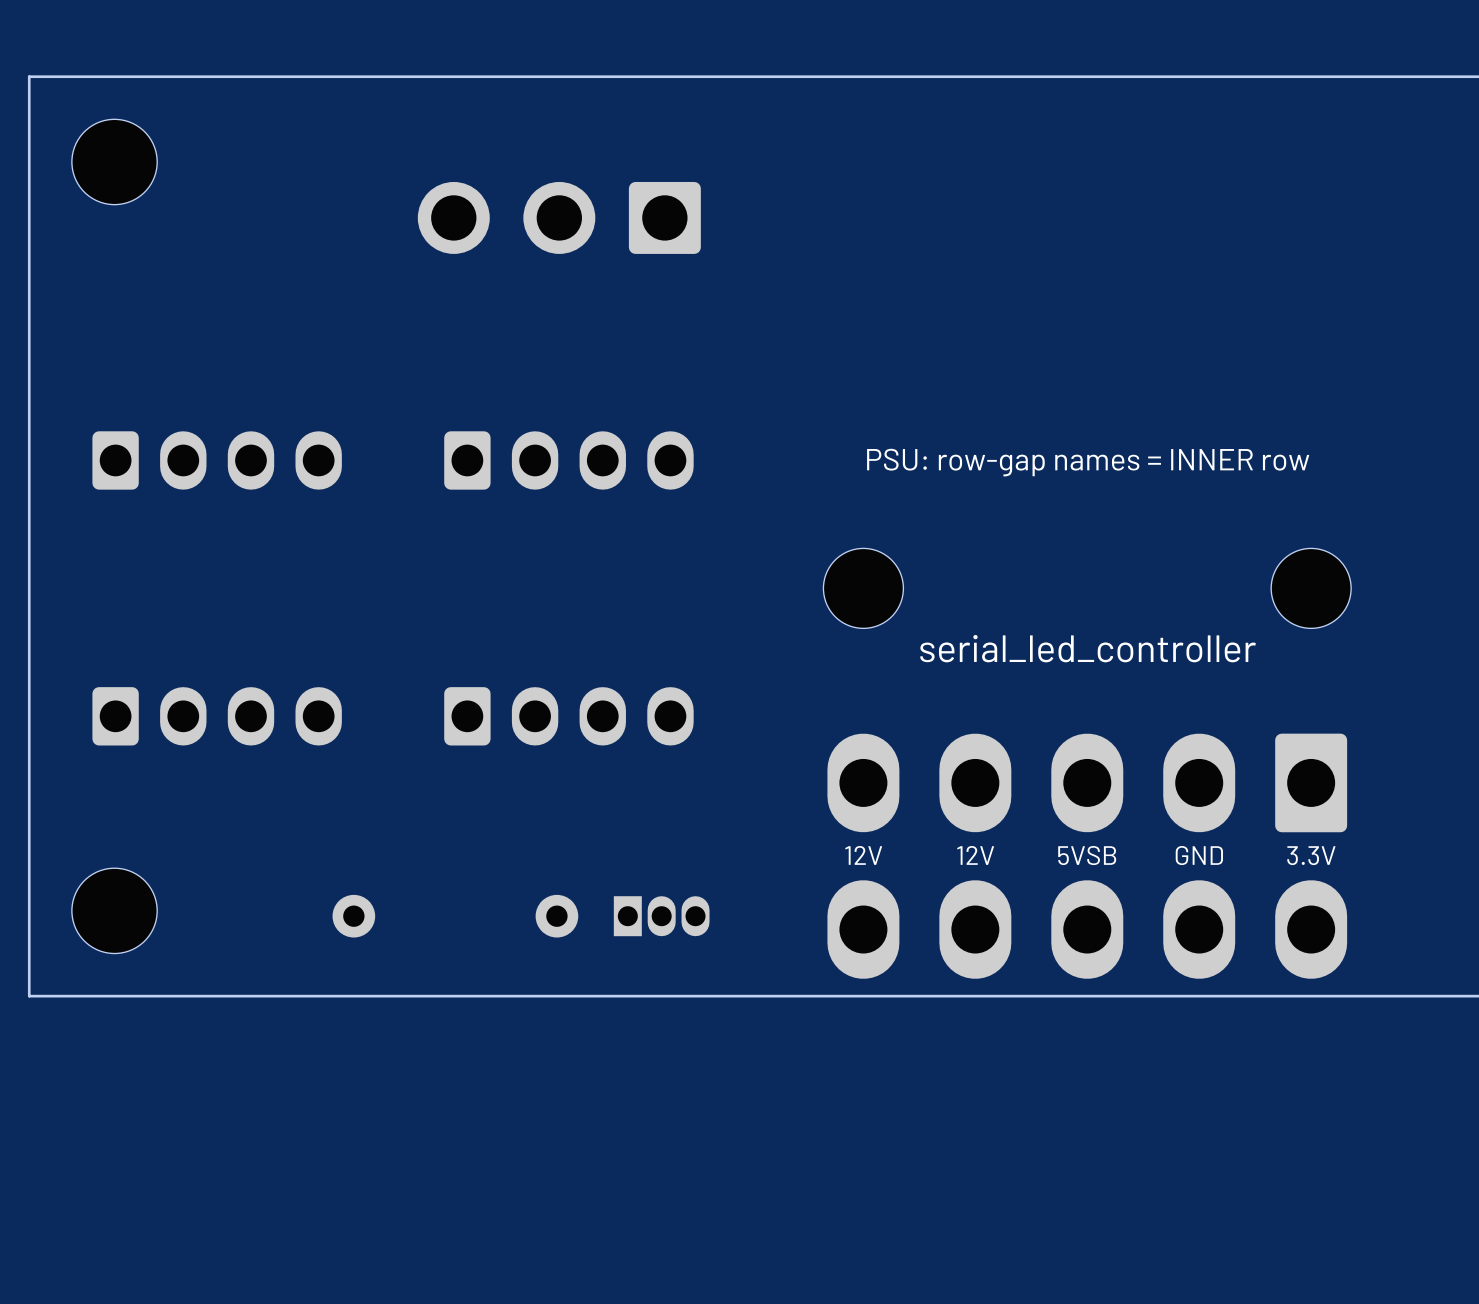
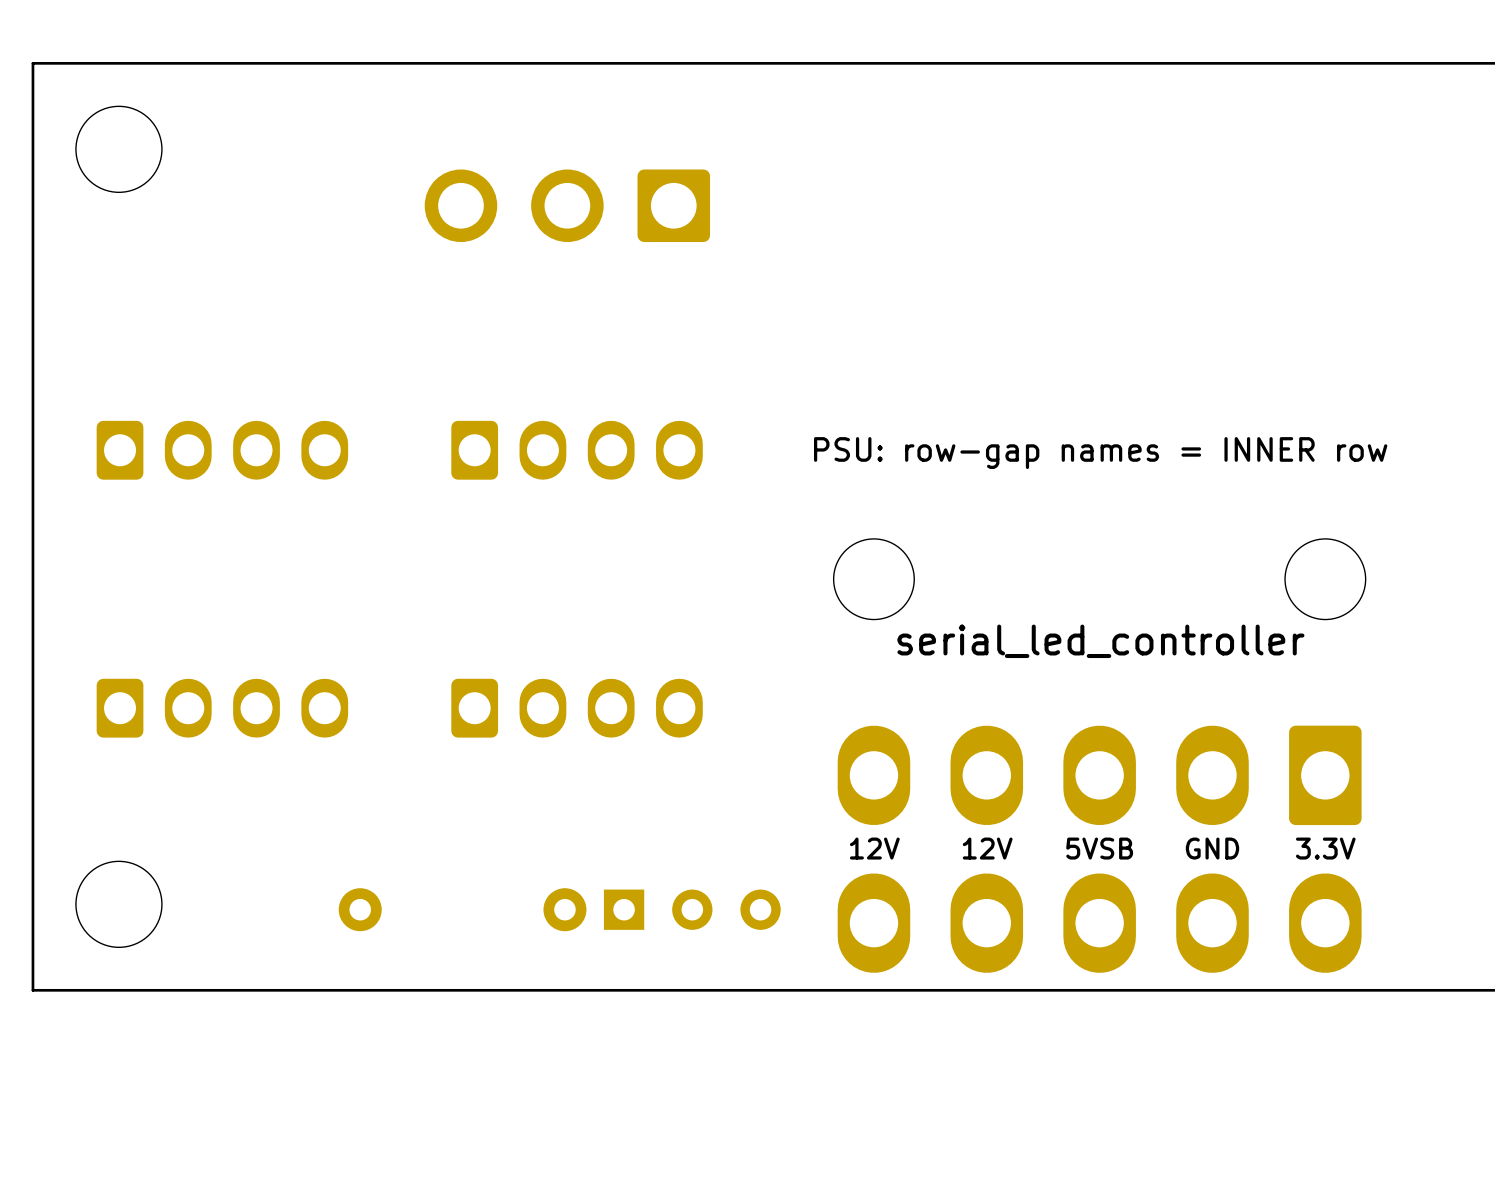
part footprint: [613, 896, 710, 937] -> [603, 889, 781, 930]

